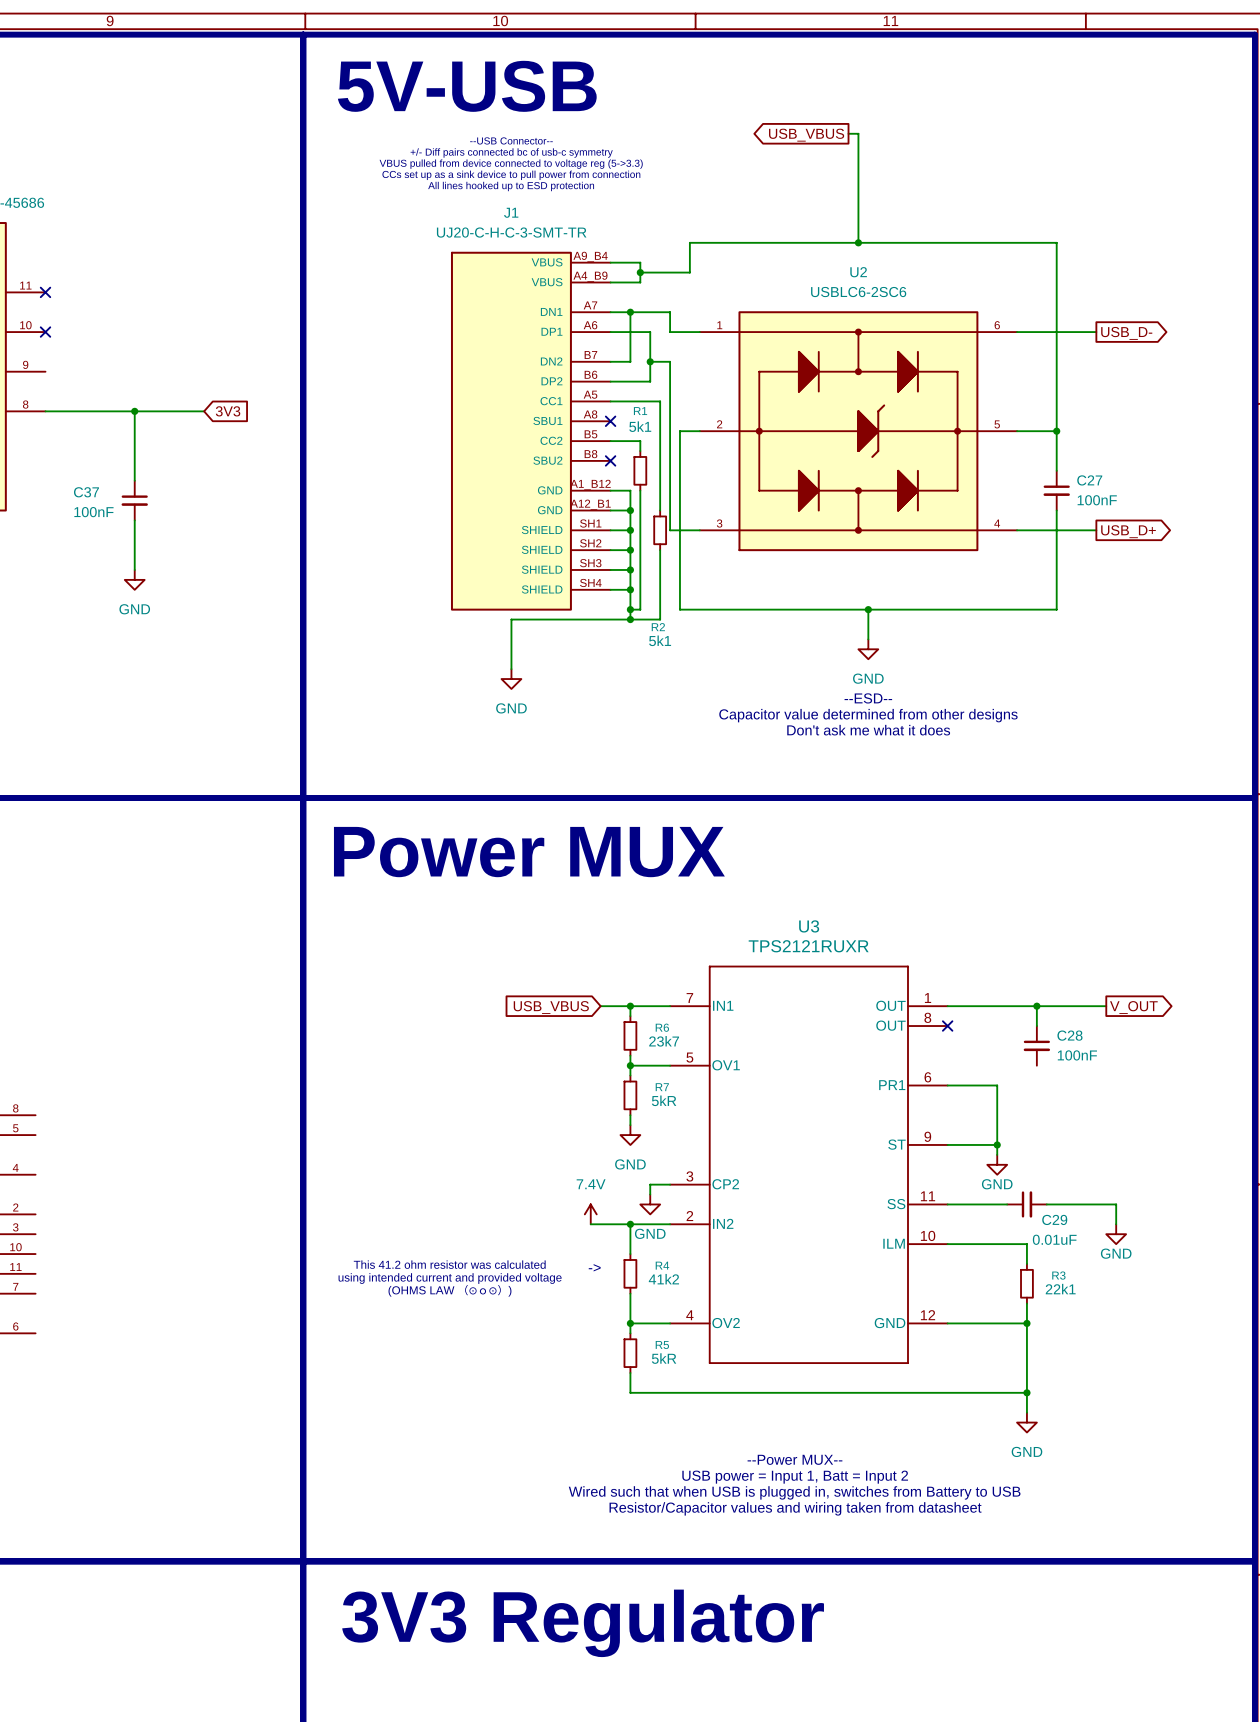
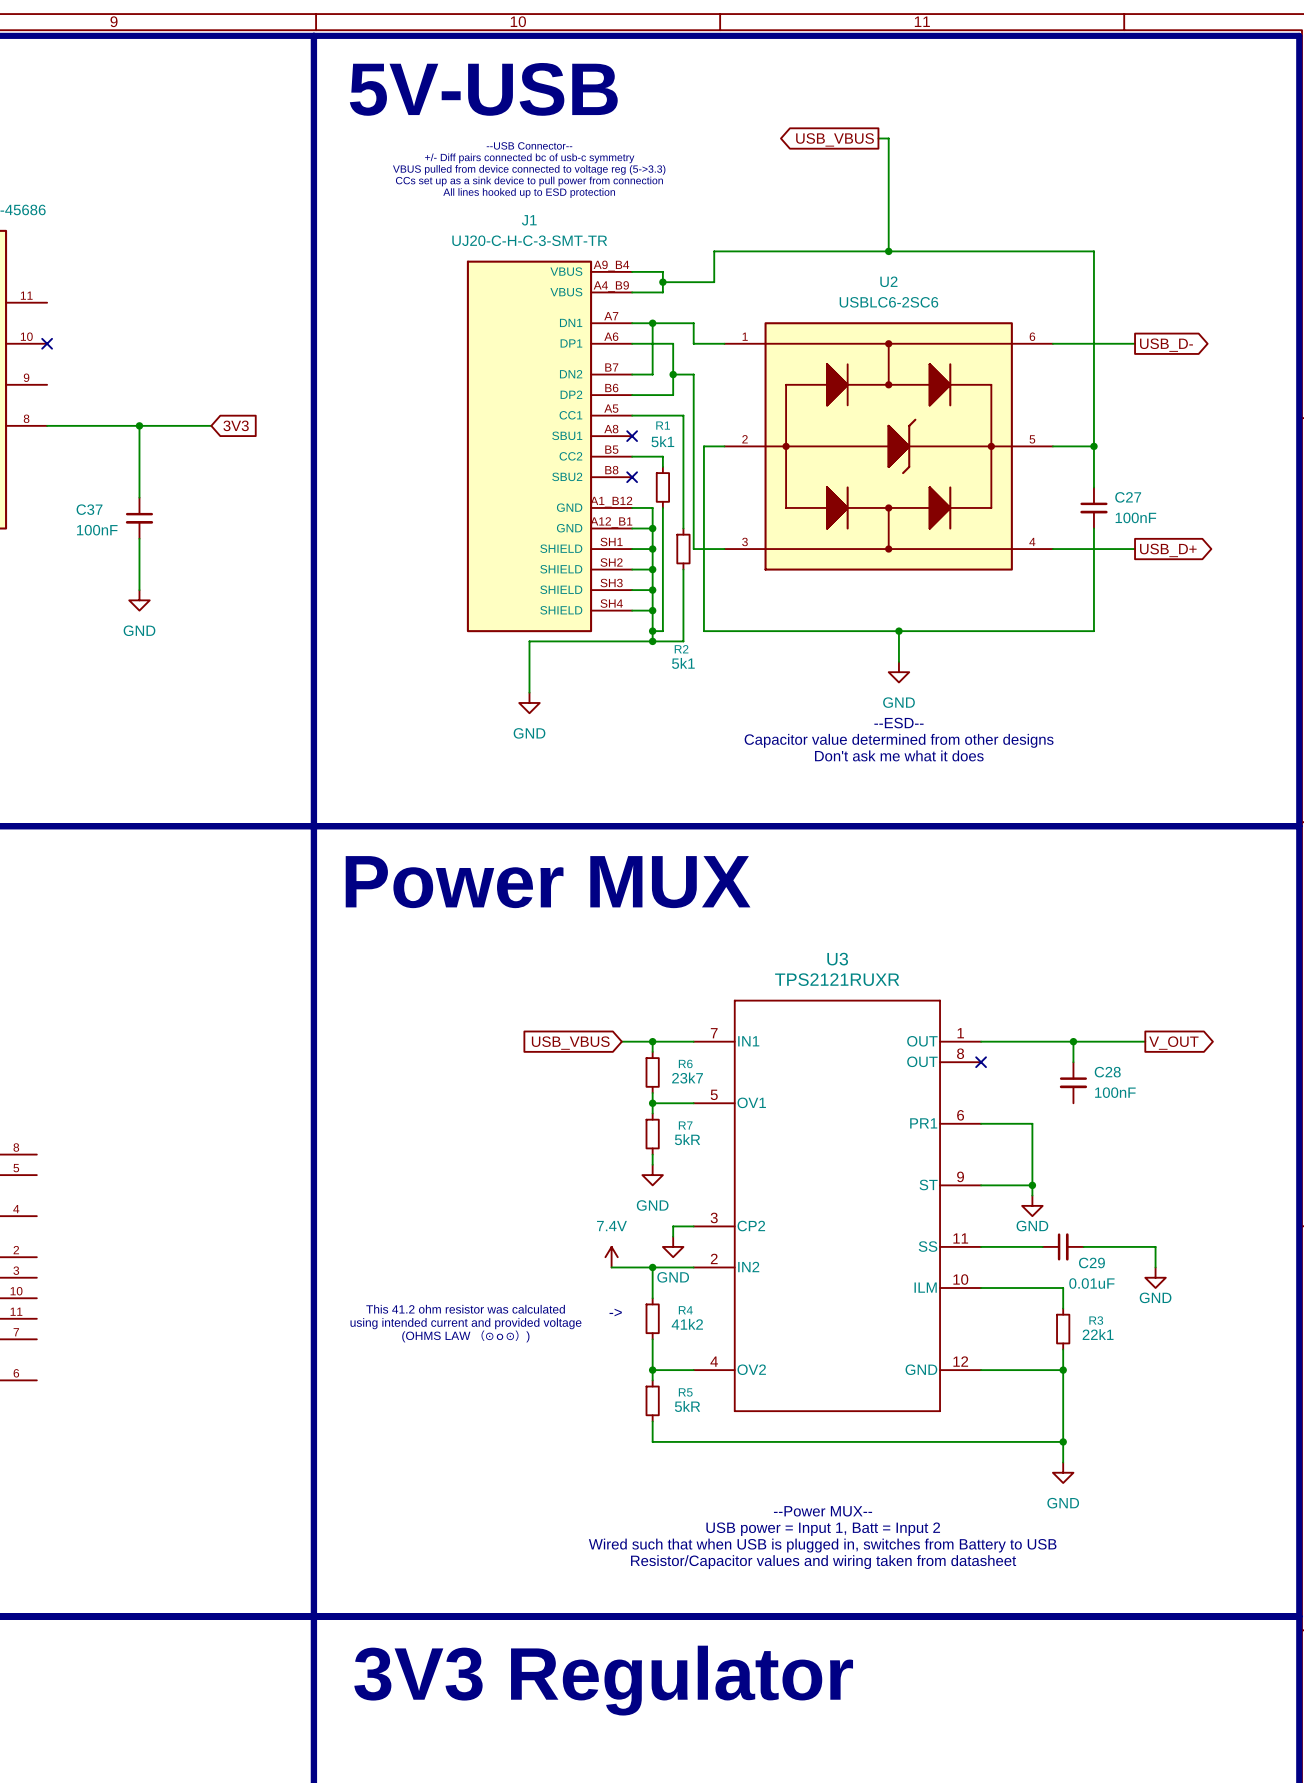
no-connect mark: (45, 292) -> none

